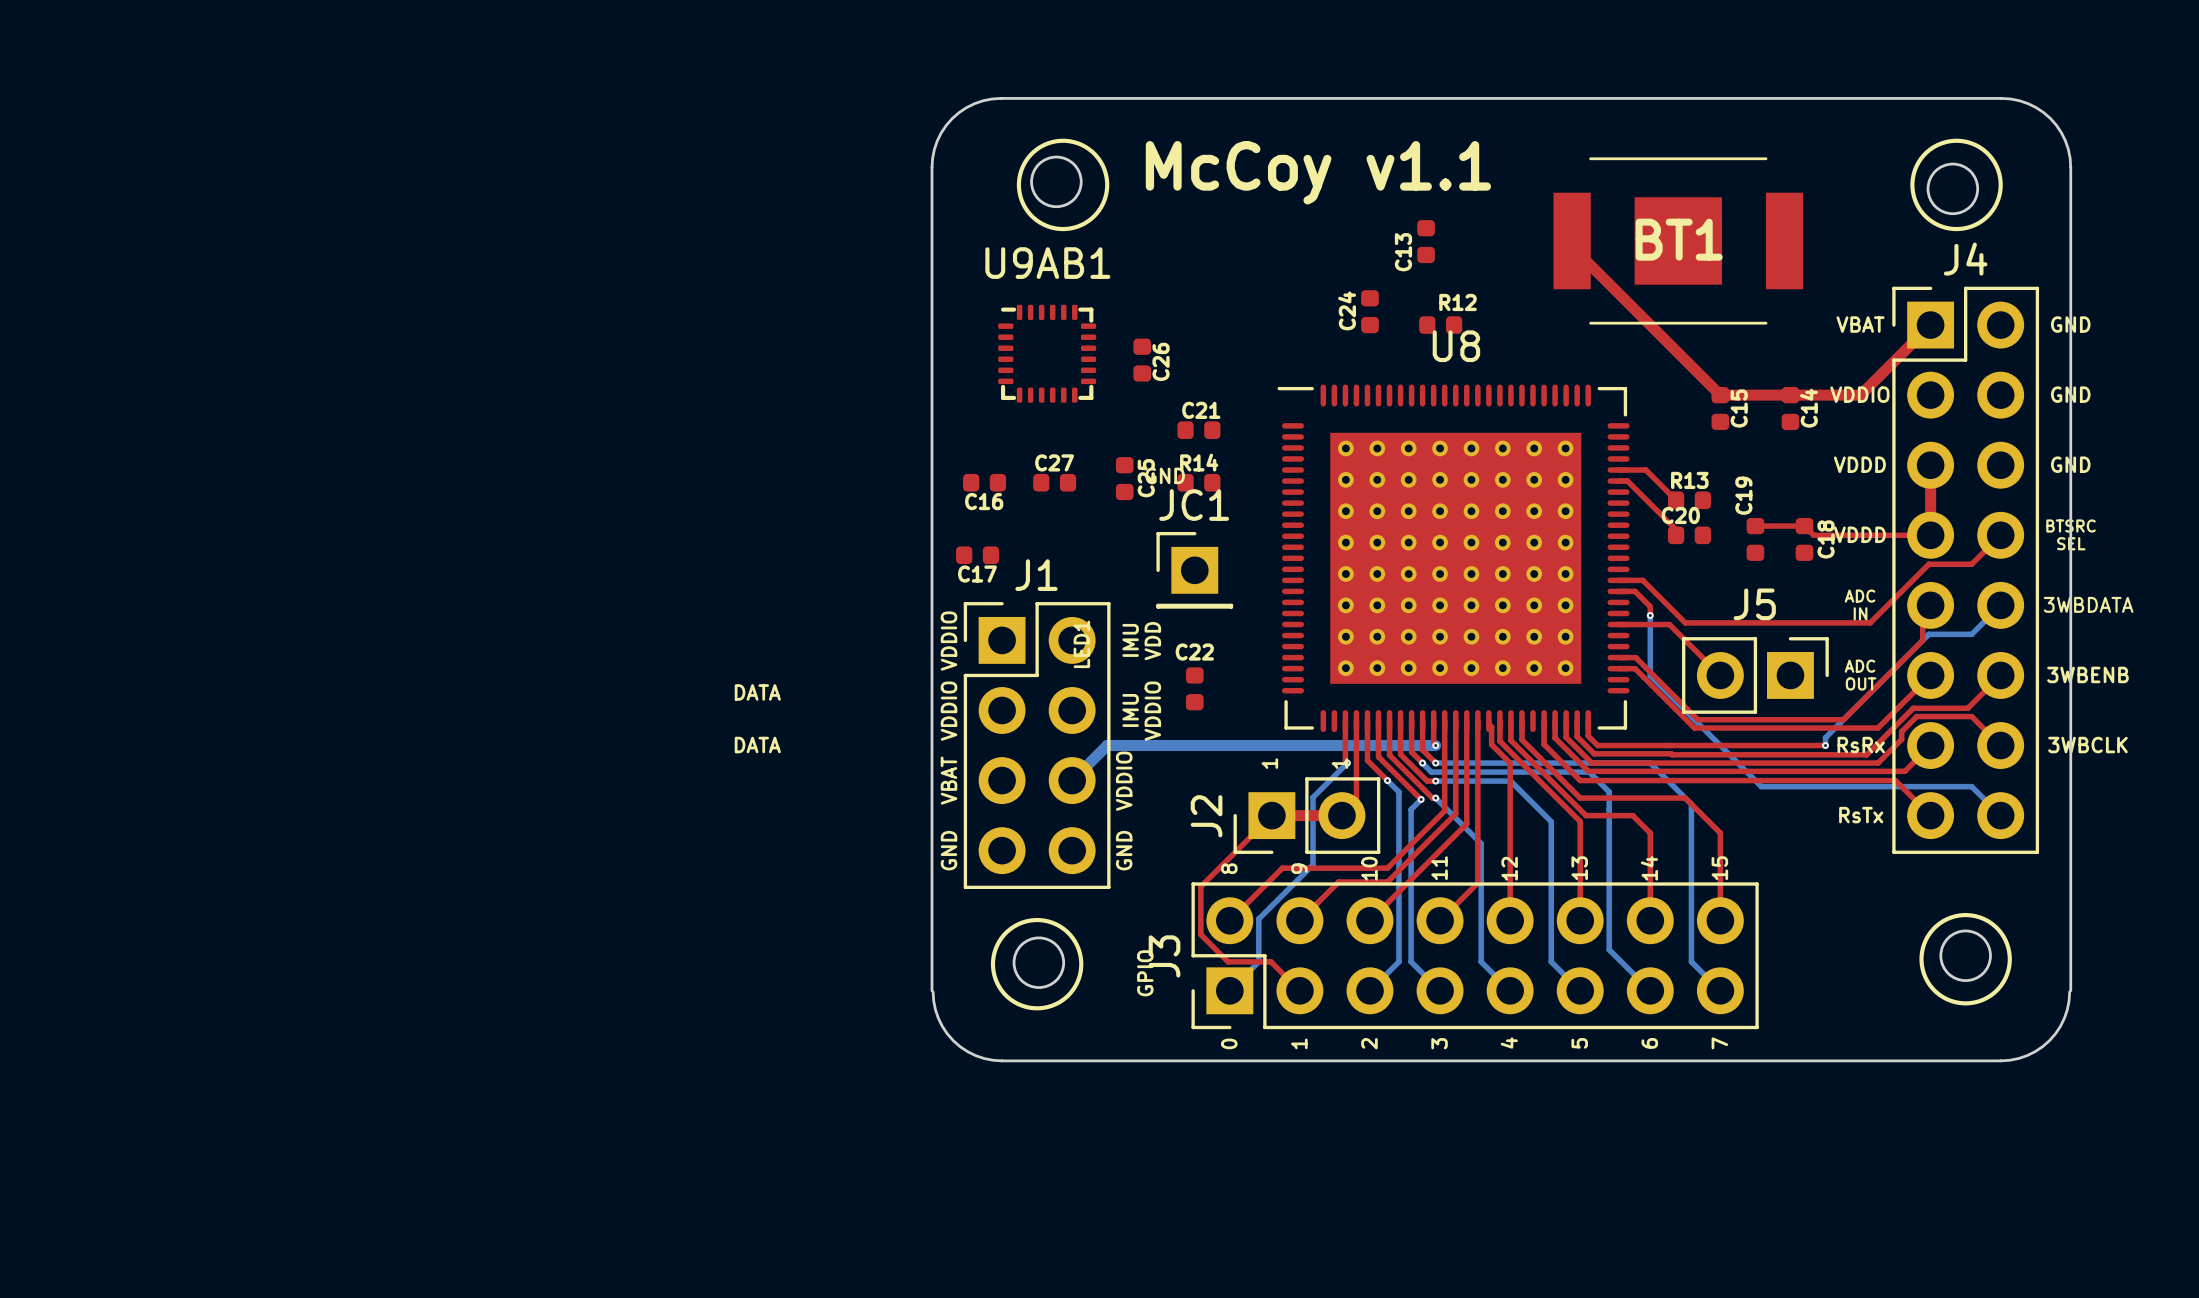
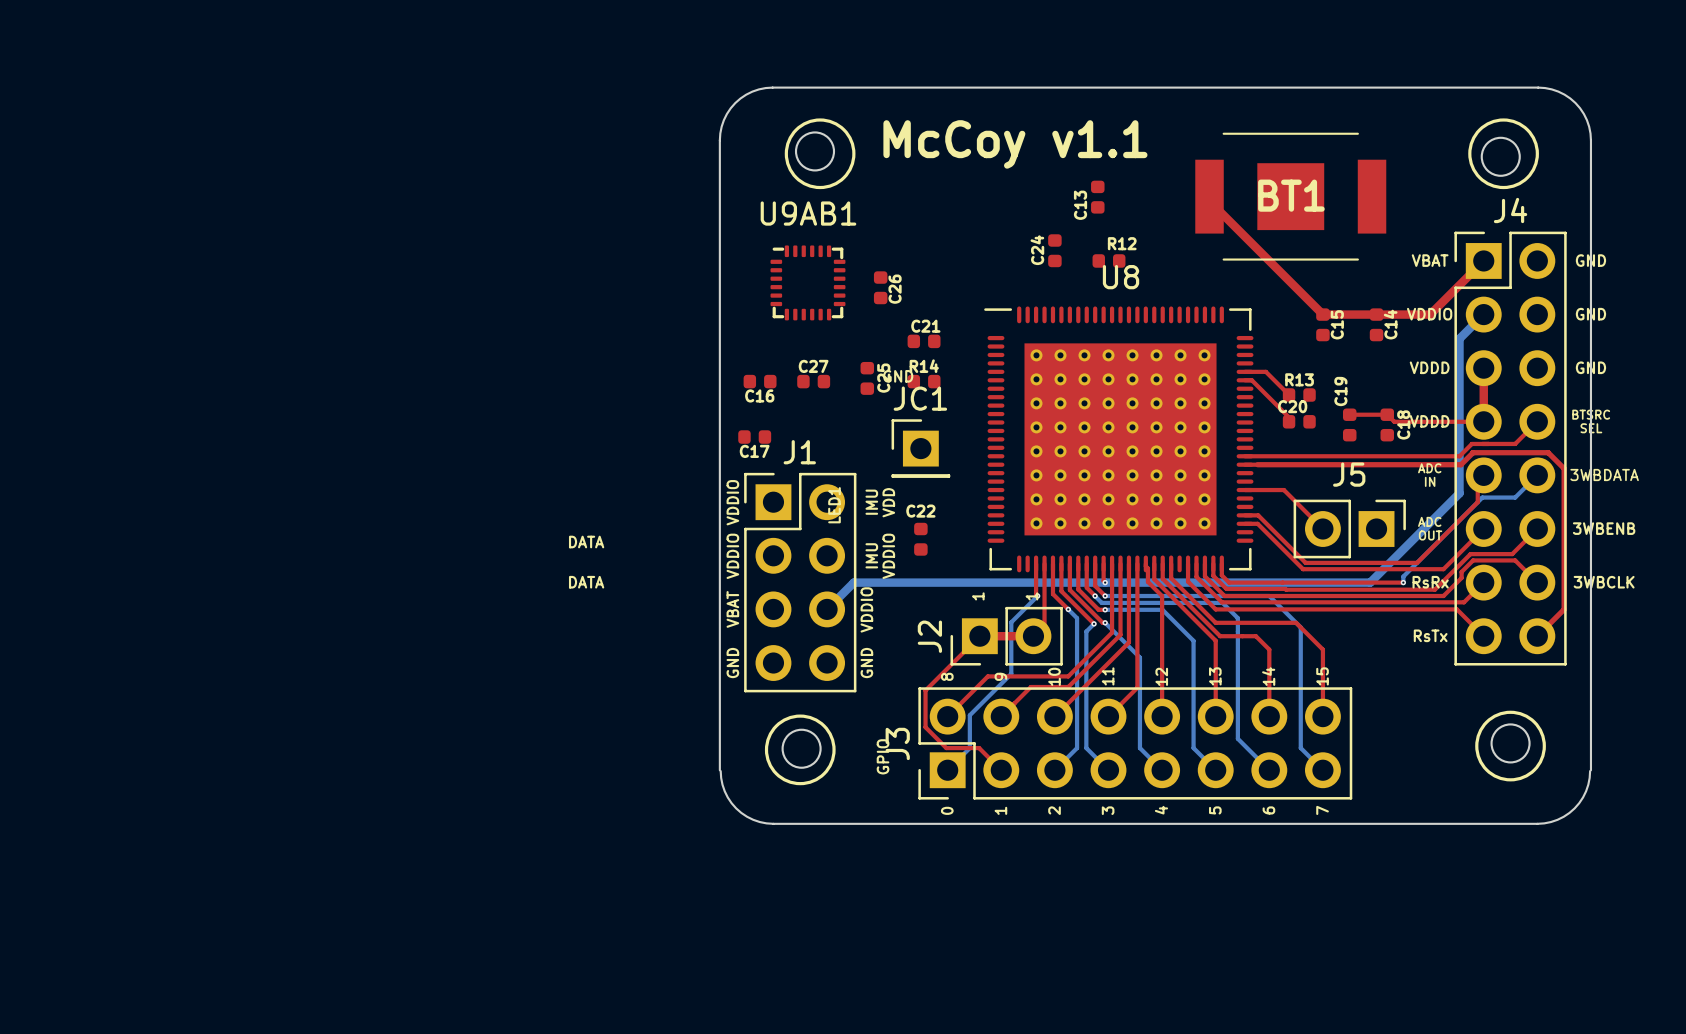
bottom track: none -> (1483, 314) (1459, 338) (1459, 493) (1370, 582) (1105, 582)
top track: (1928, 564) (1870, 622) (1685, 622) (1642, 580) -> (1482, 443) (1471, 443) (1459, 456) (1263, 456)
top track: none -> (1472, 452) (1548, 452) (1564, 468) (1564, 609) (1537, 636)
top track: (1635, 591) (1650, 606) (1650, 615) -> (1257, 464) (1461, 464) (1472, 452)
bottom track: (1650, 615) (1650, 675) (1761, 786) (1971, 786) (2000, 815) -> none
via: (1650, 615) -> none

